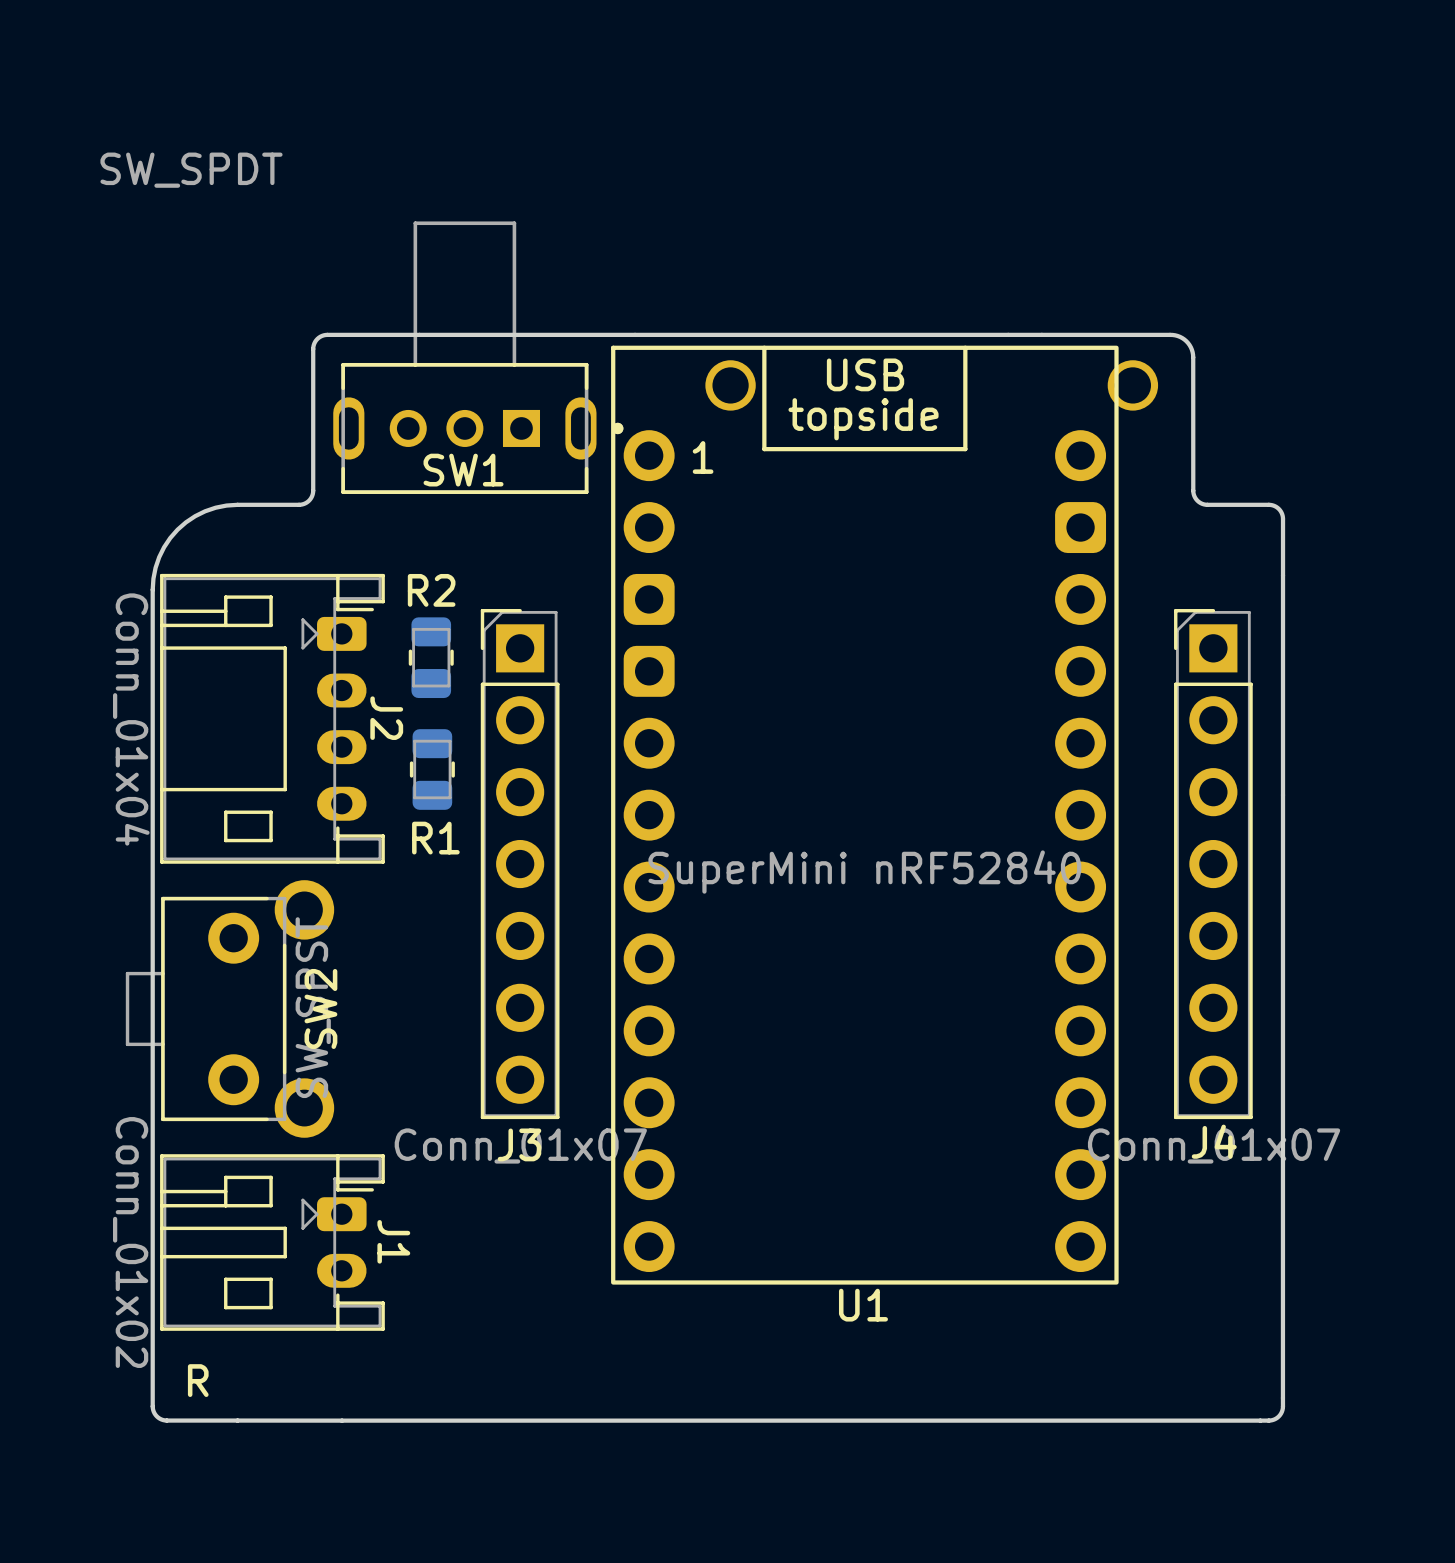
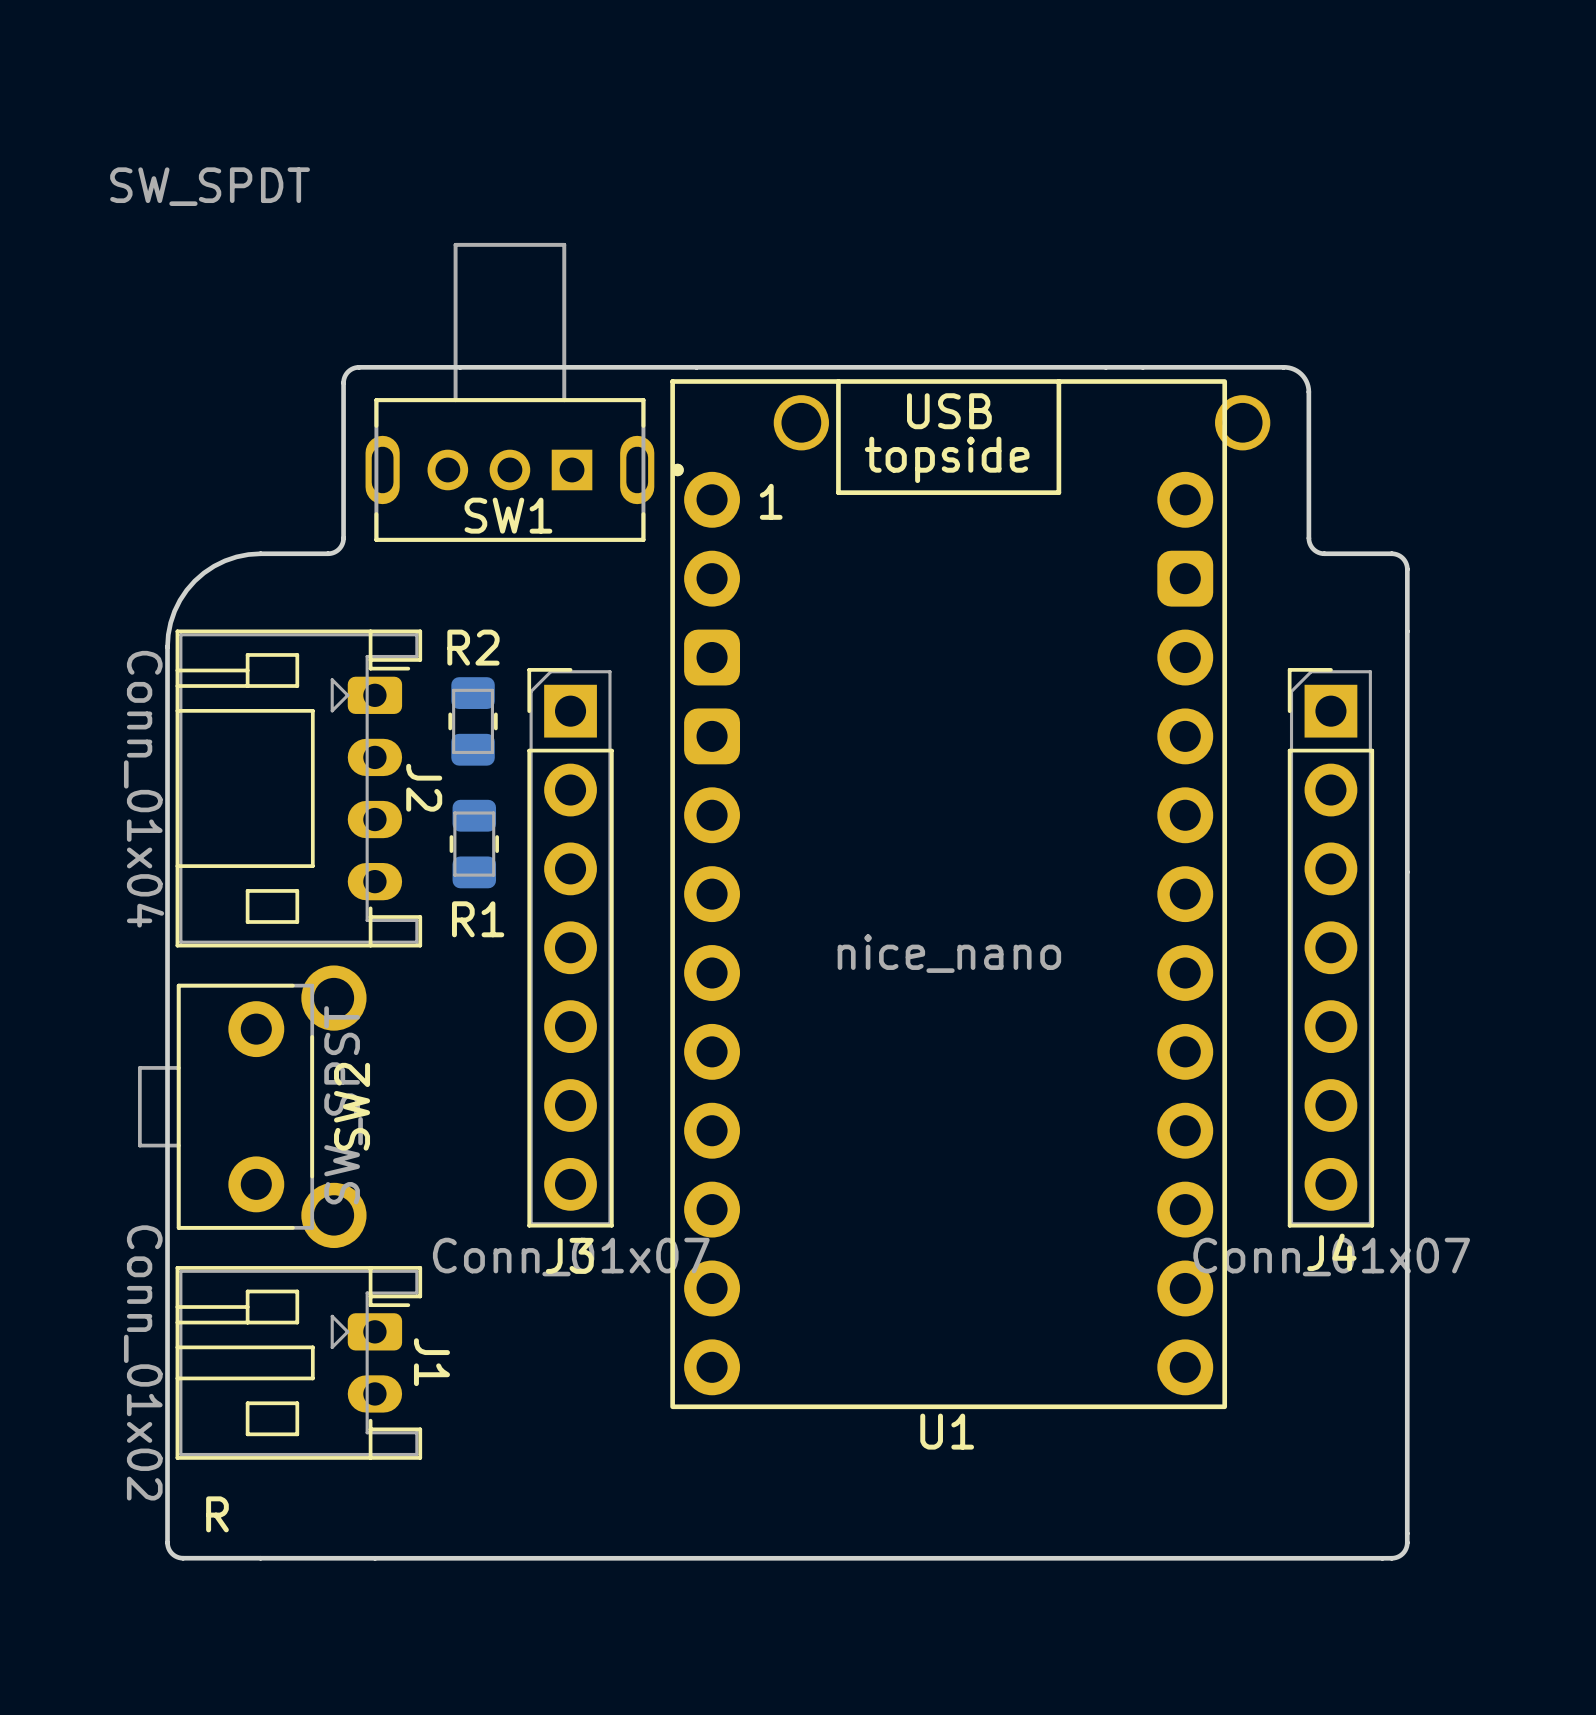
U1 value: SuperMini nRF52840 (864, 872) -> nice_nano (949, 953)

